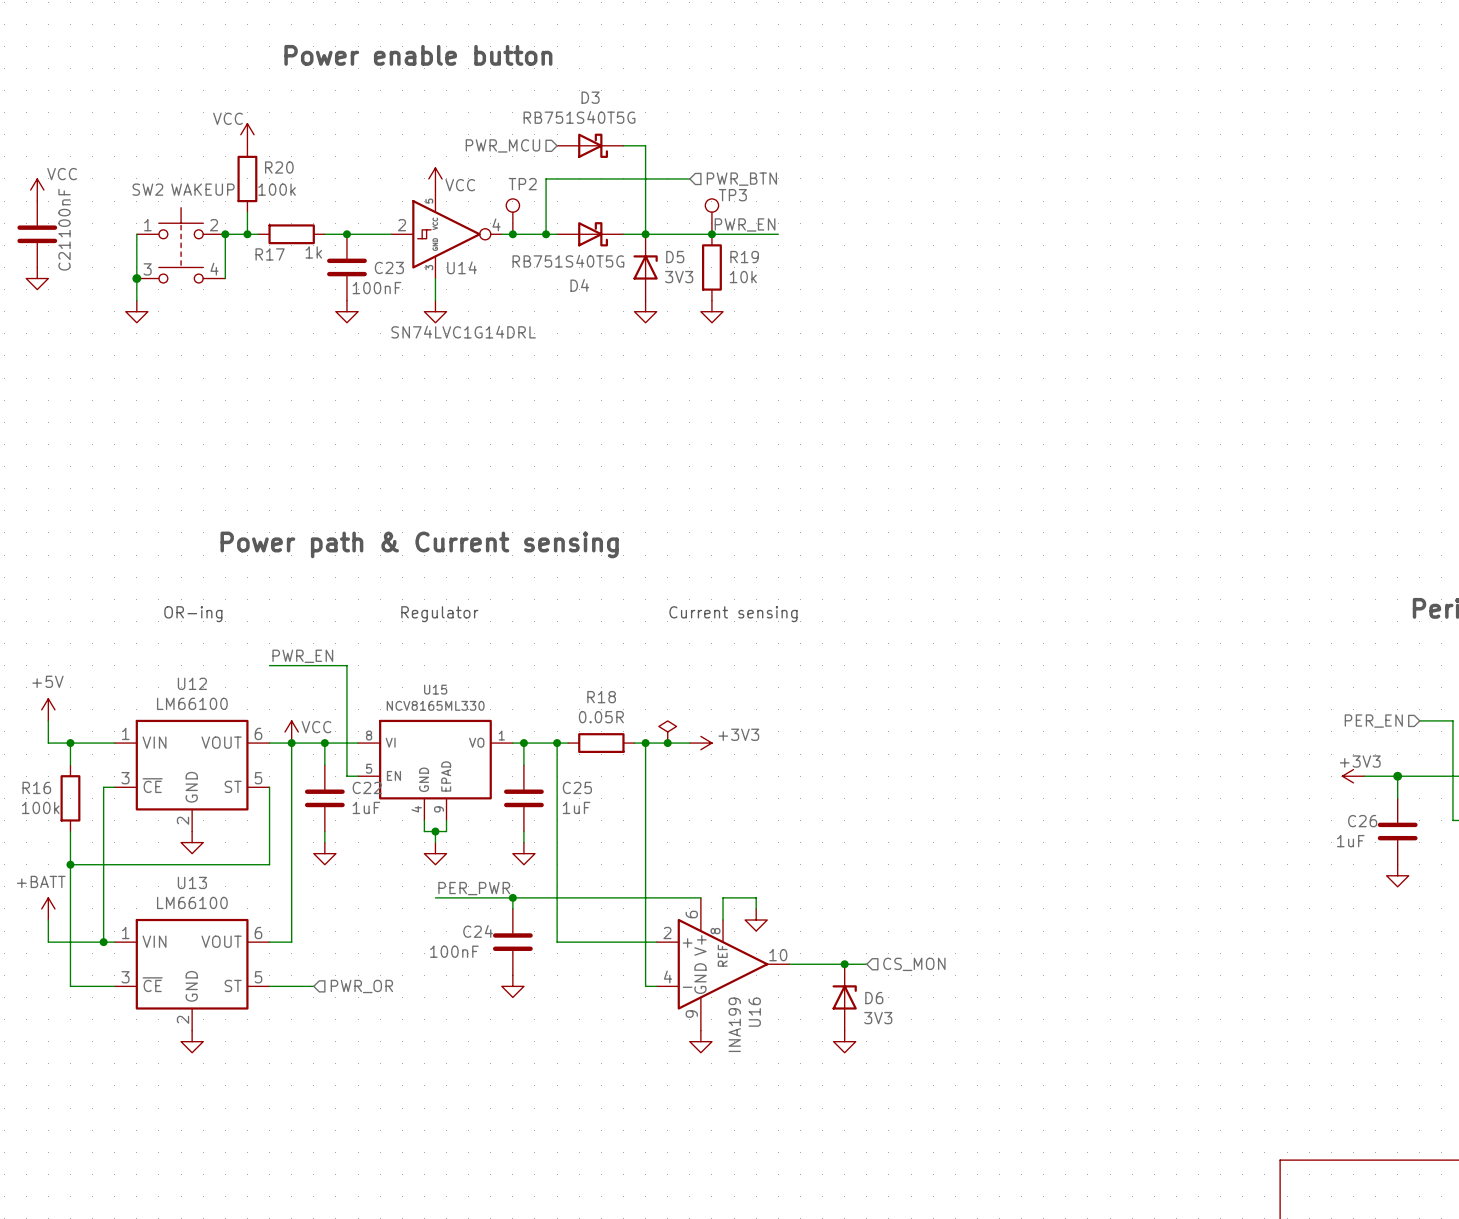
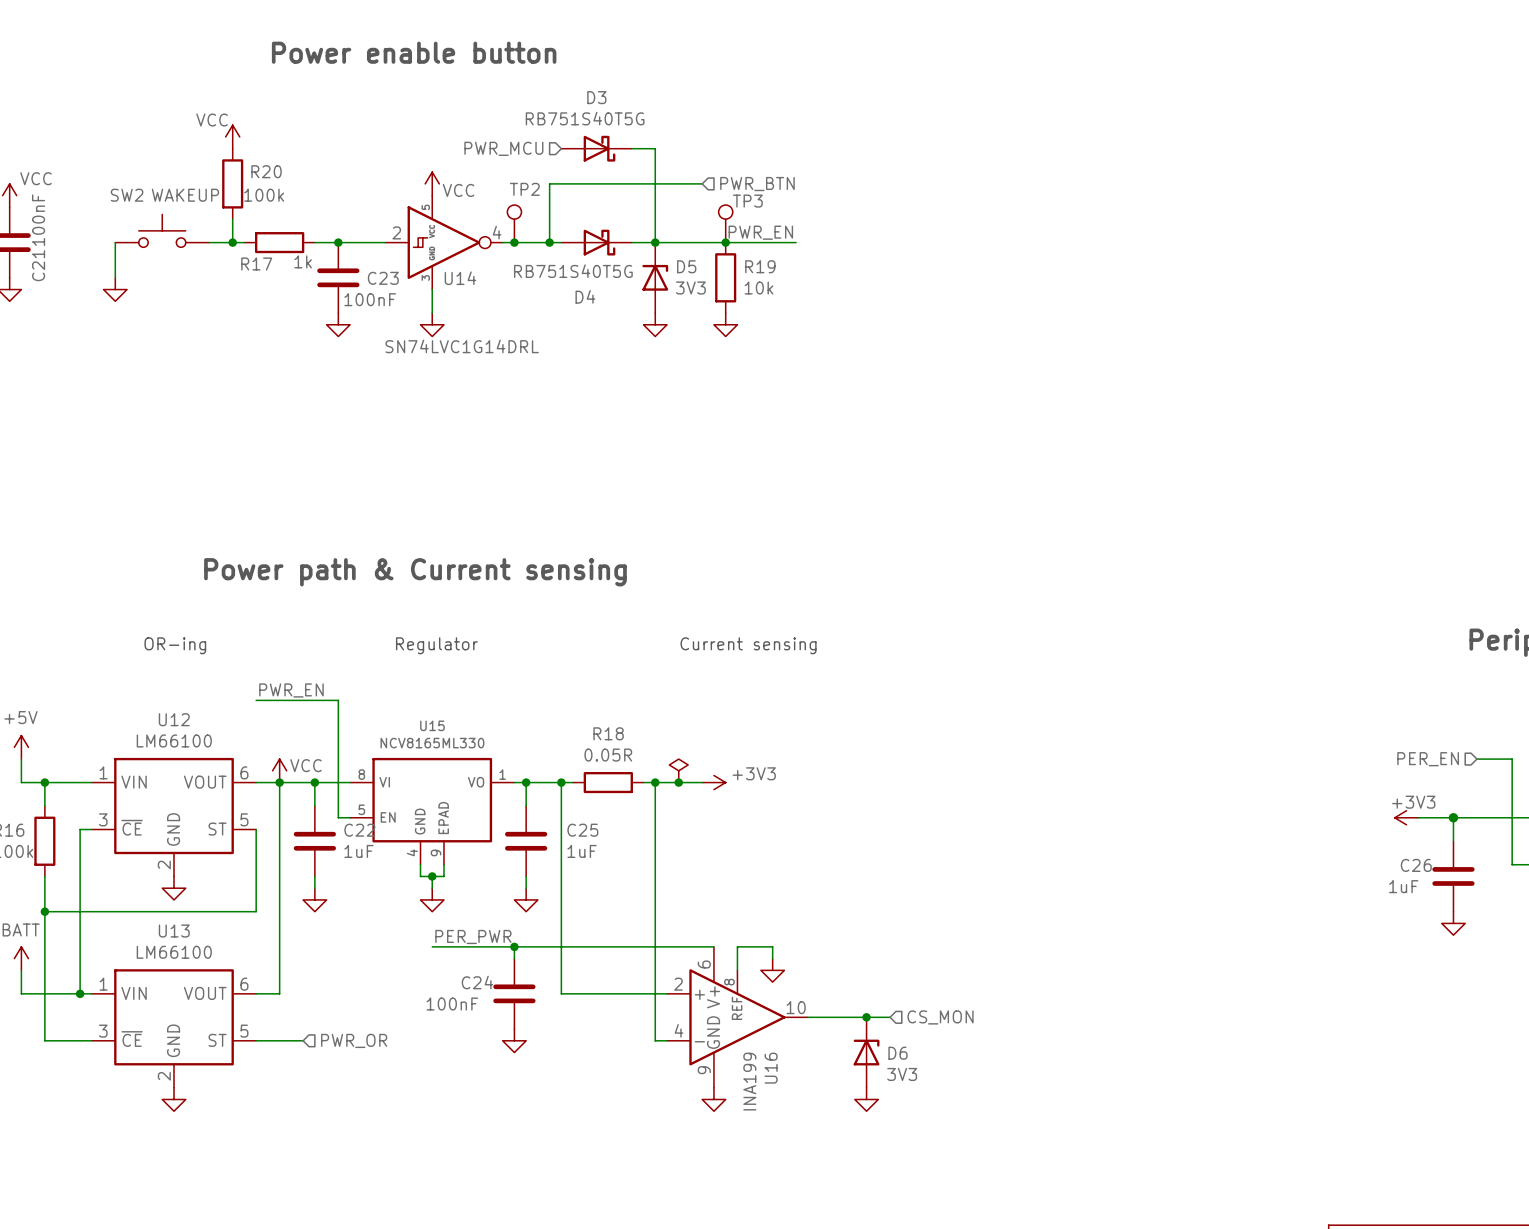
SW2 symbol: [136, 207, 226, 283] -> [115, 214, 210, 248]
wire: (225, 234) (225, 278) -> none
junction: (225, 234) -> none
wire: (136, 267) (136, 300) -> none
junction: (136, 278) -> none
power symbol position: (136, 311) -> (115, 289)

